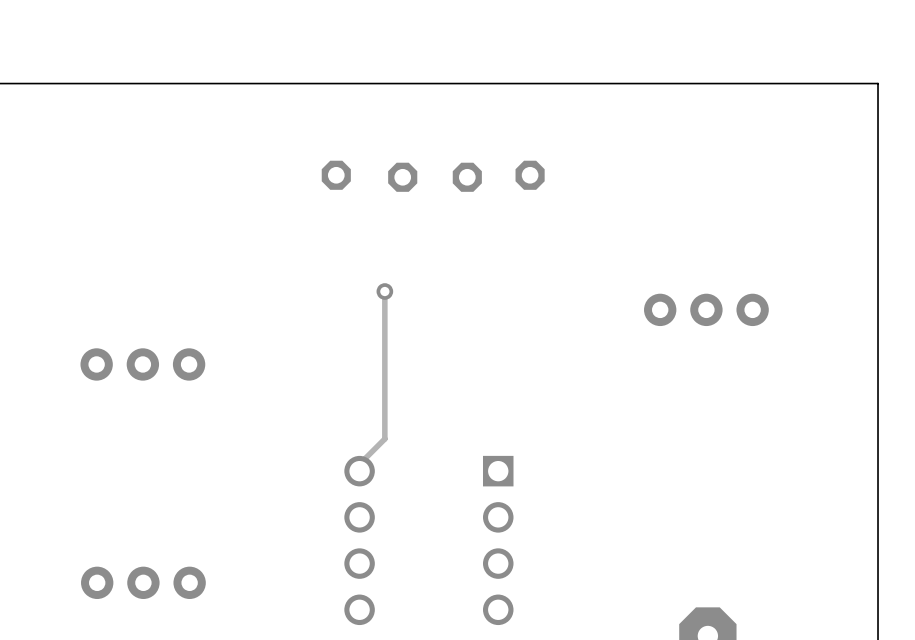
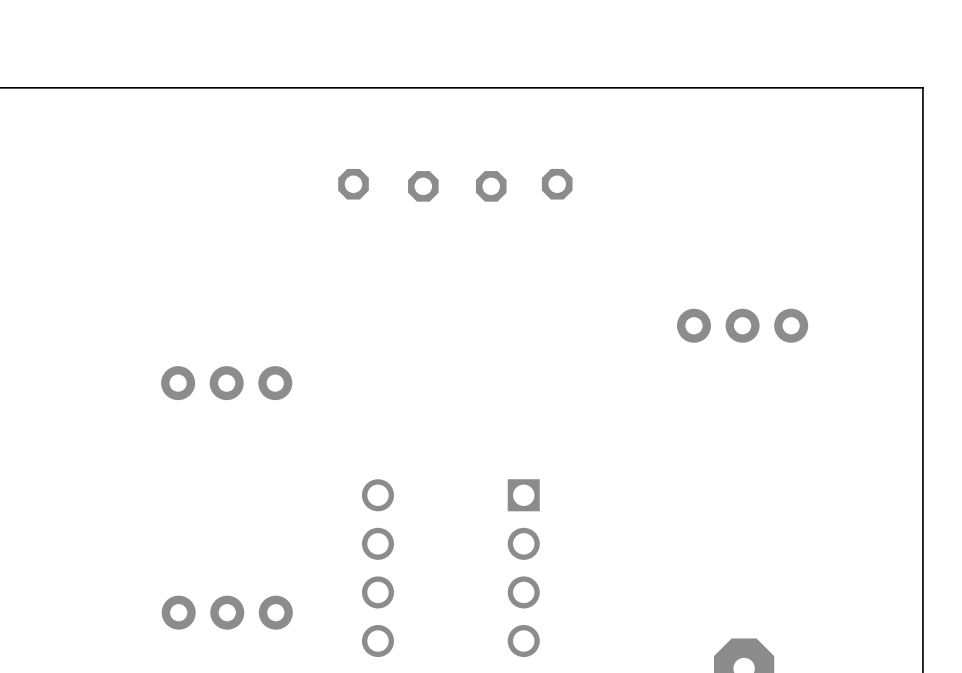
track: (384, 291) (384, 438) (364, 459) (364, 469) (359, 471) -> none
via: (384, 291) -> none
part position: (142, 364) -> (226, 383)
part position: (143, 582) -> (227, 612)

